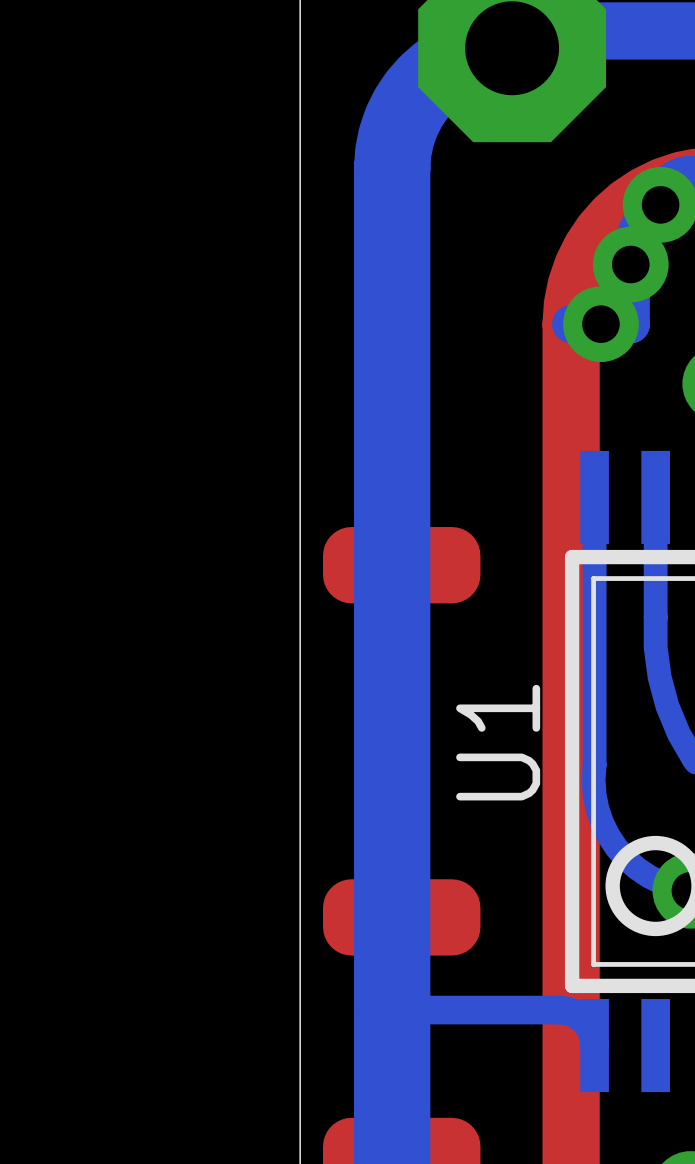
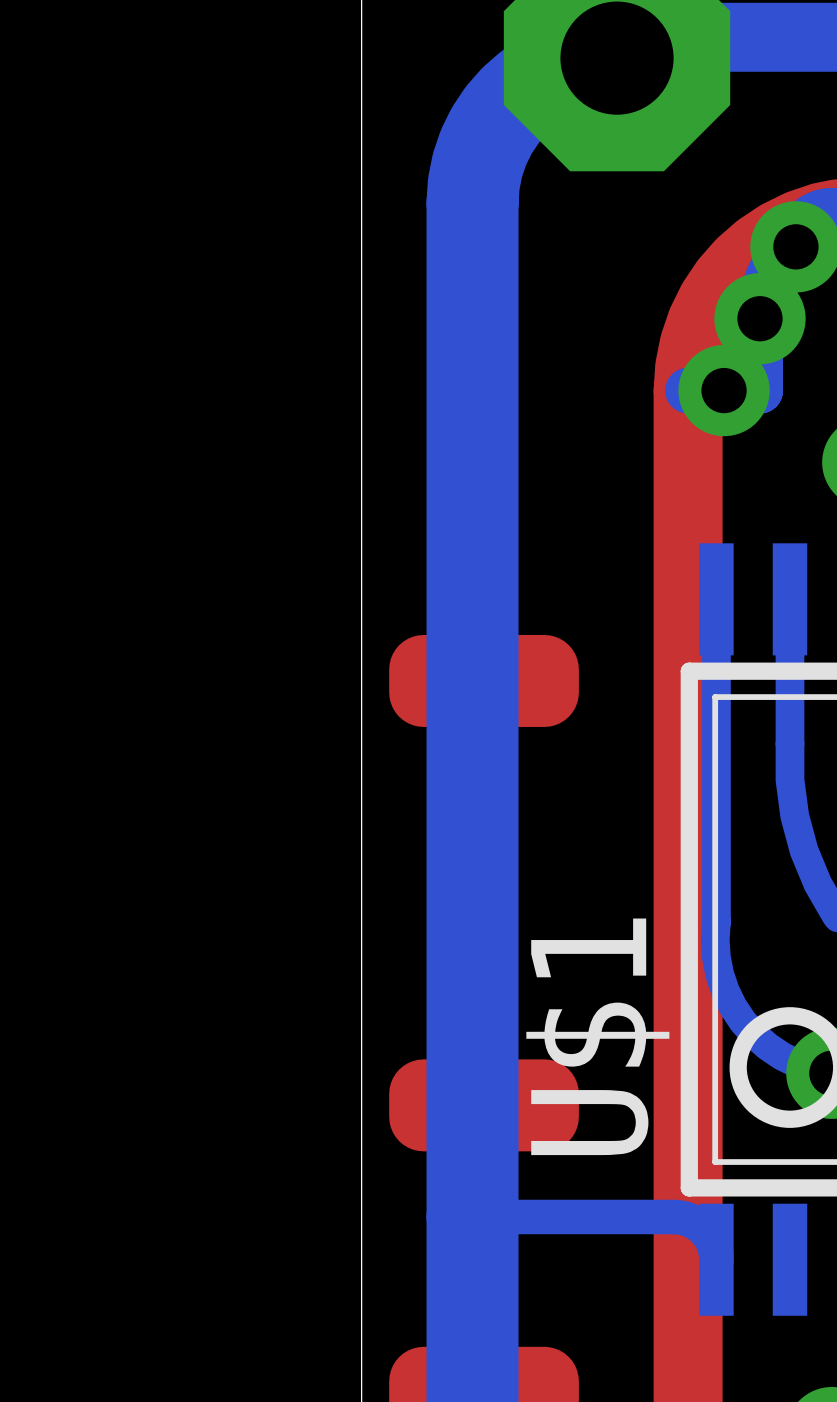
U1 name: U1 (498, 742) -> U$1 (597, 1036)

